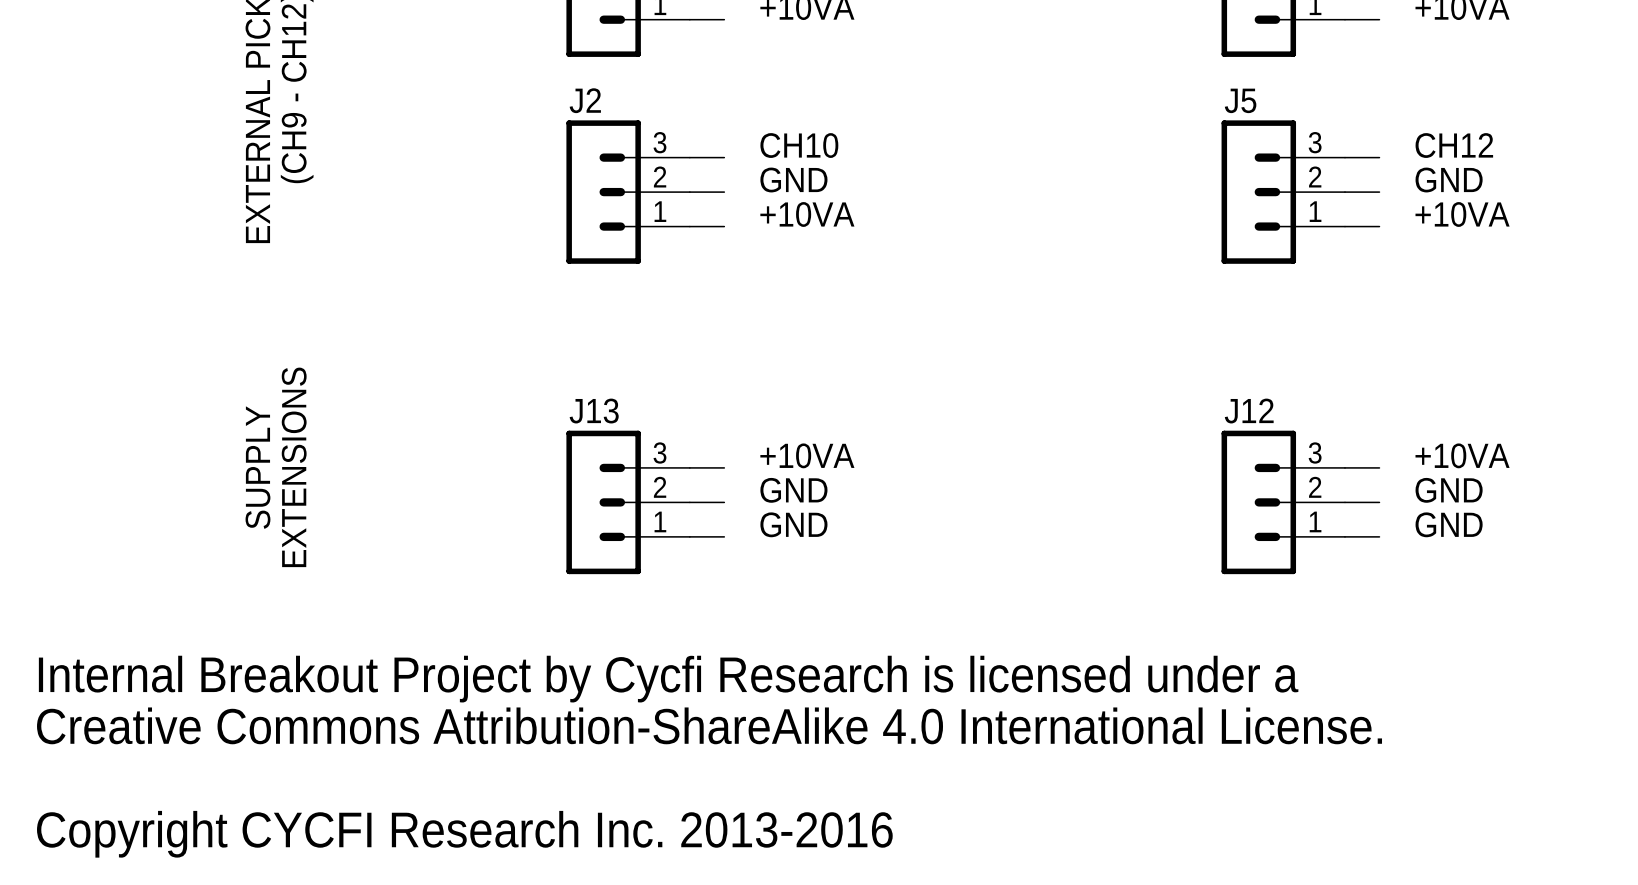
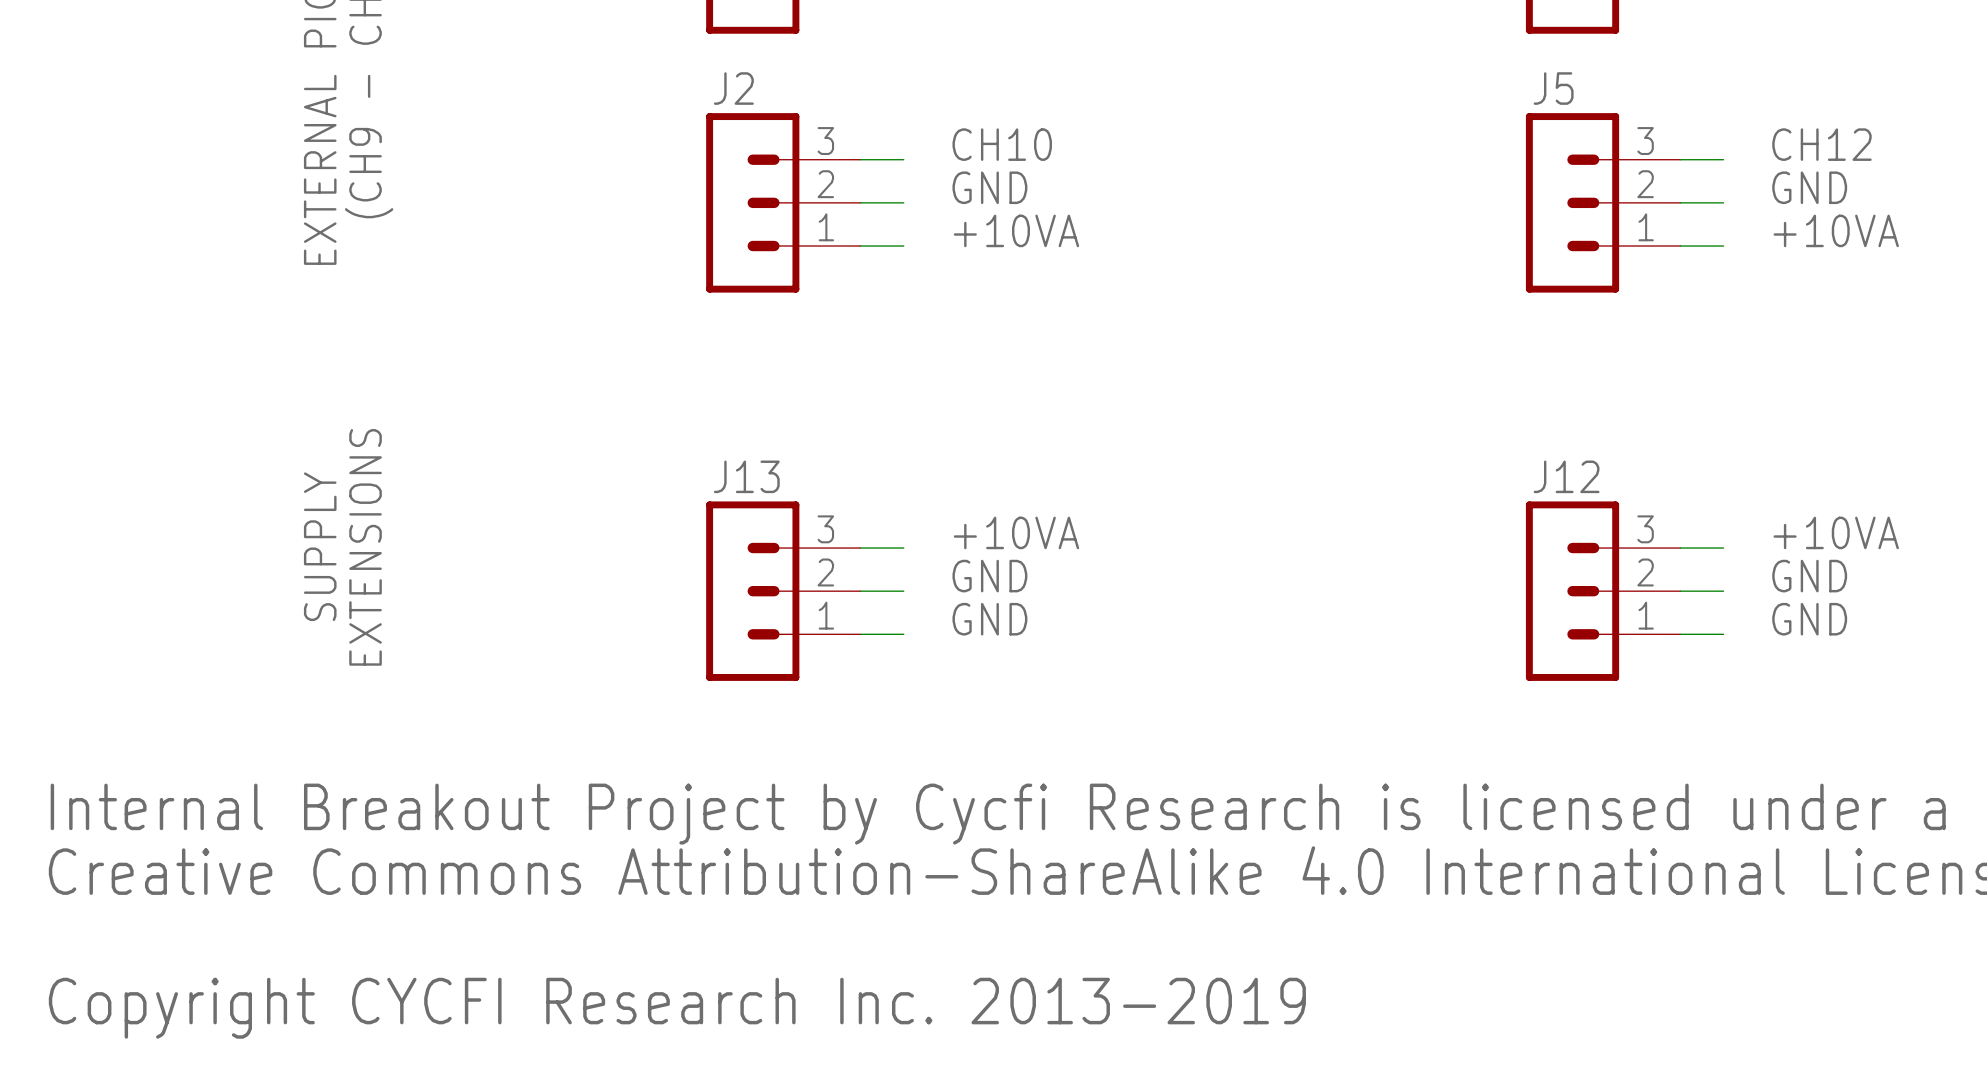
text: Copyright CYCFI Research Inc. 2013-2016 (464, 834) -> Copyright CYCFI Research Inc. 2013-2019 (677, 1008)

